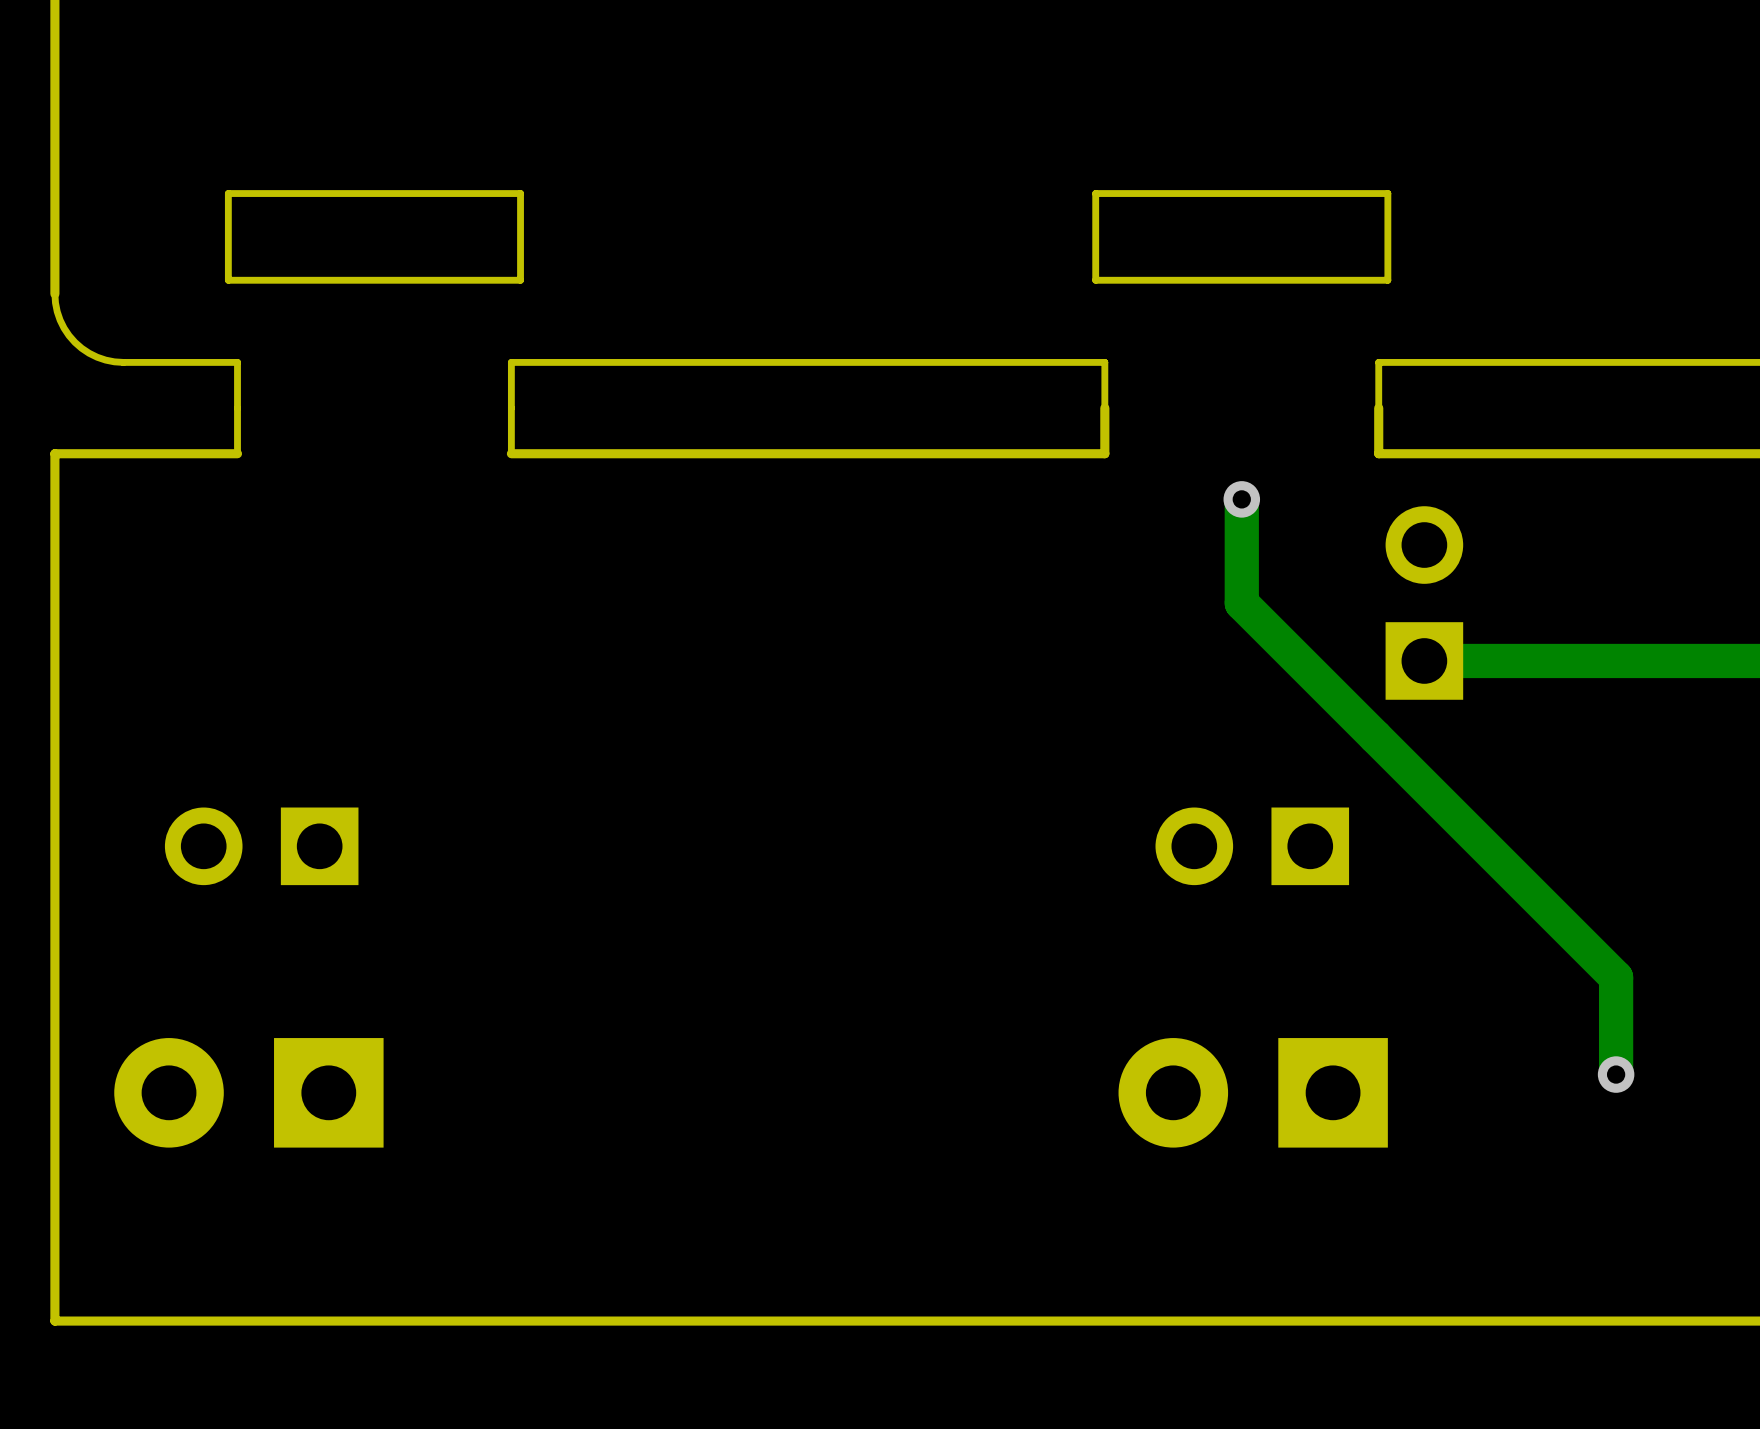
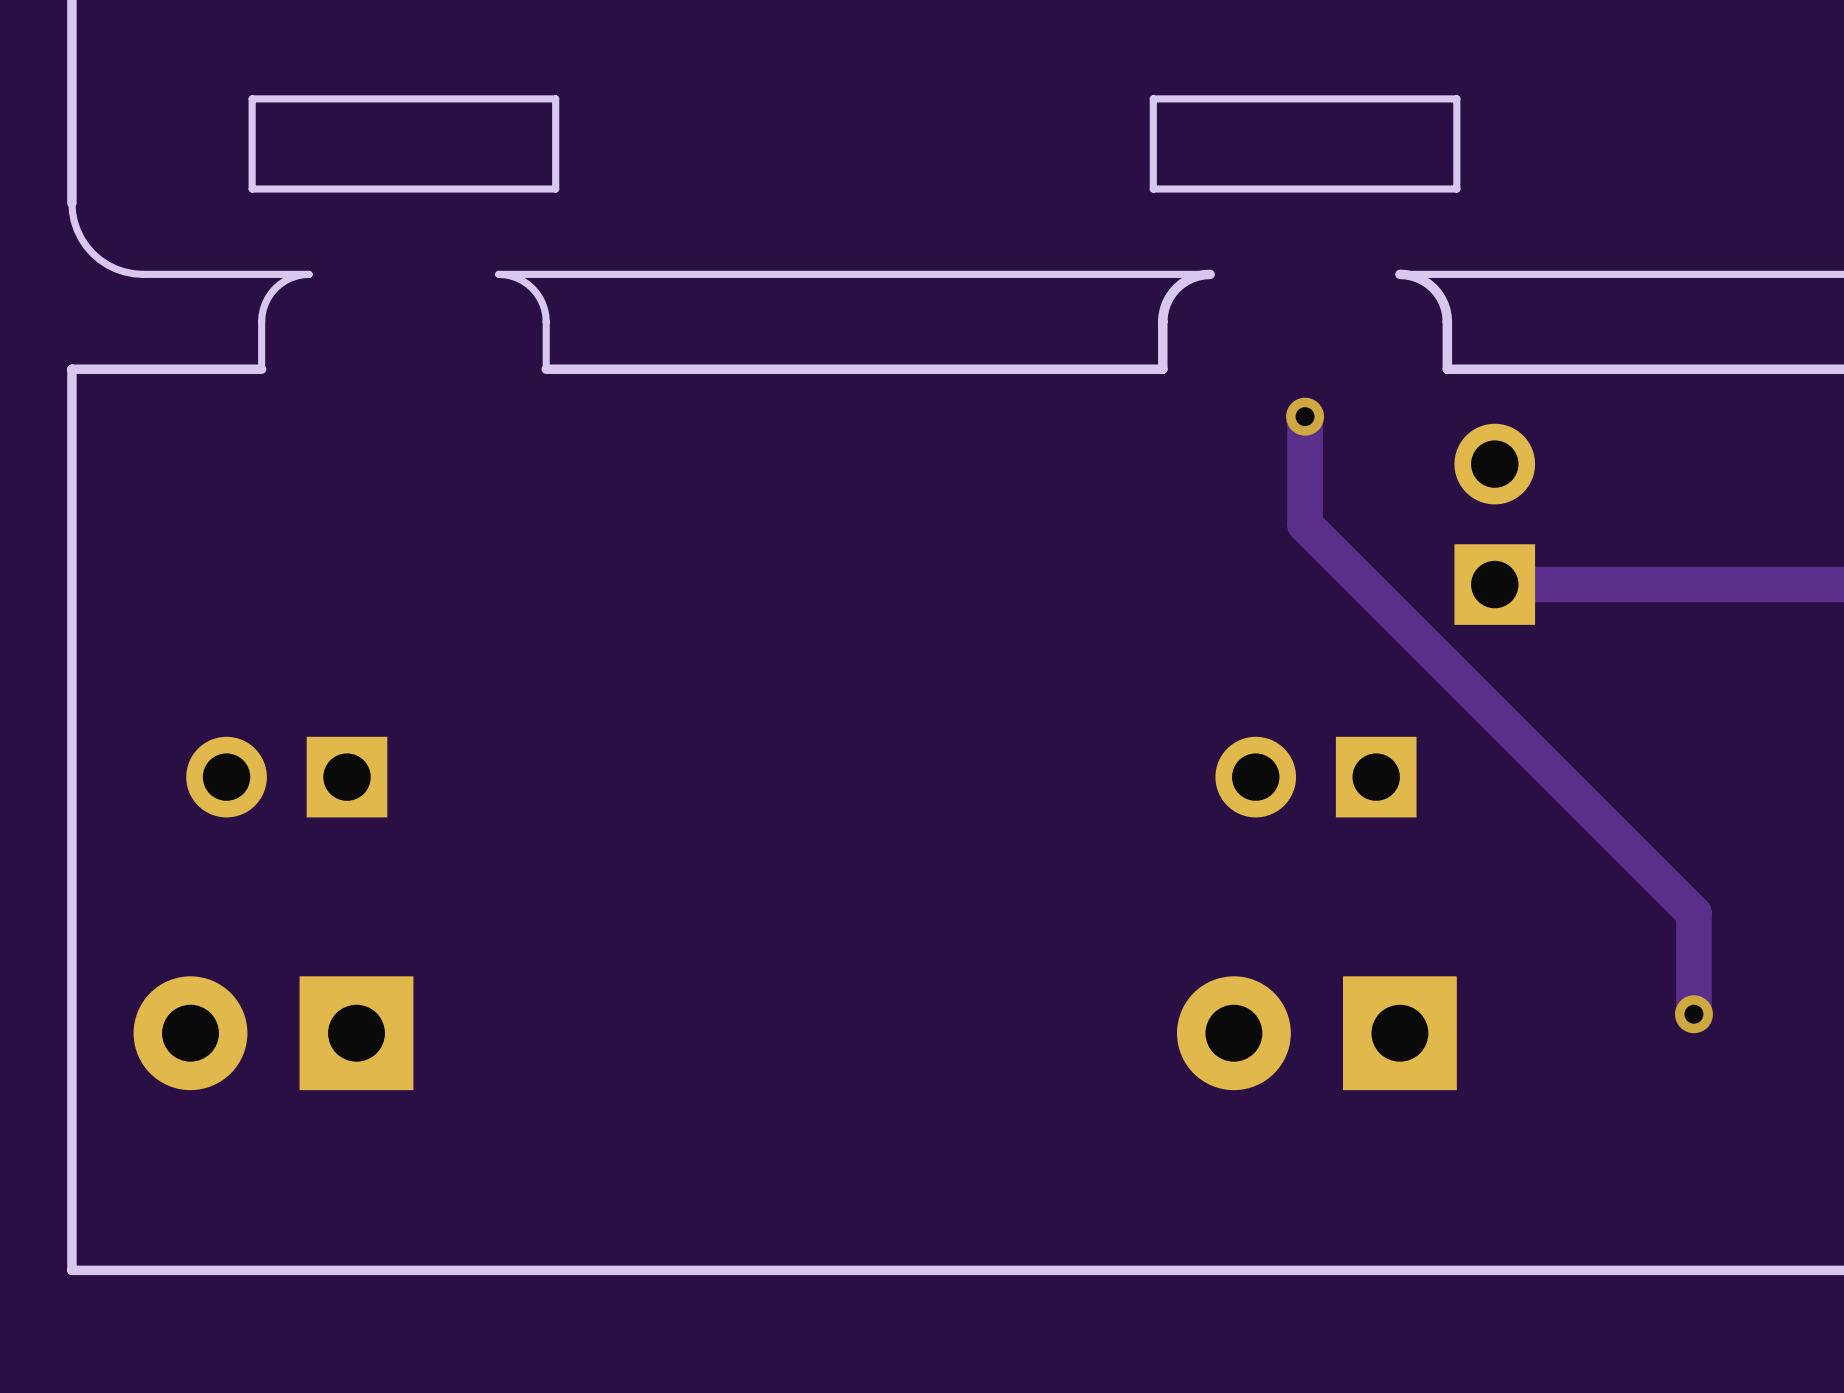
board edge: (237, 362) (237, 408) -> (261, 274) (309, 274) (290, 277) (275, 288) (265, 303) (261, 321)
board edge: (511, 362) (511, 408) -> (546, 274) (498, 274) (516, 277) (532, 288) (542, 303) (546, 321)
board edge: (1104, 362) (1104, 408) -> (1162, 274) (1210, 274) (1192, 277) (1176, 288) (1166, 303) (1162, 321)
board edge: (1378, 362) (1378, 408) -> (1447, 274) (1399, 274) (1418, 277) (1433, 288) (1443, 303) (1447, 321)

